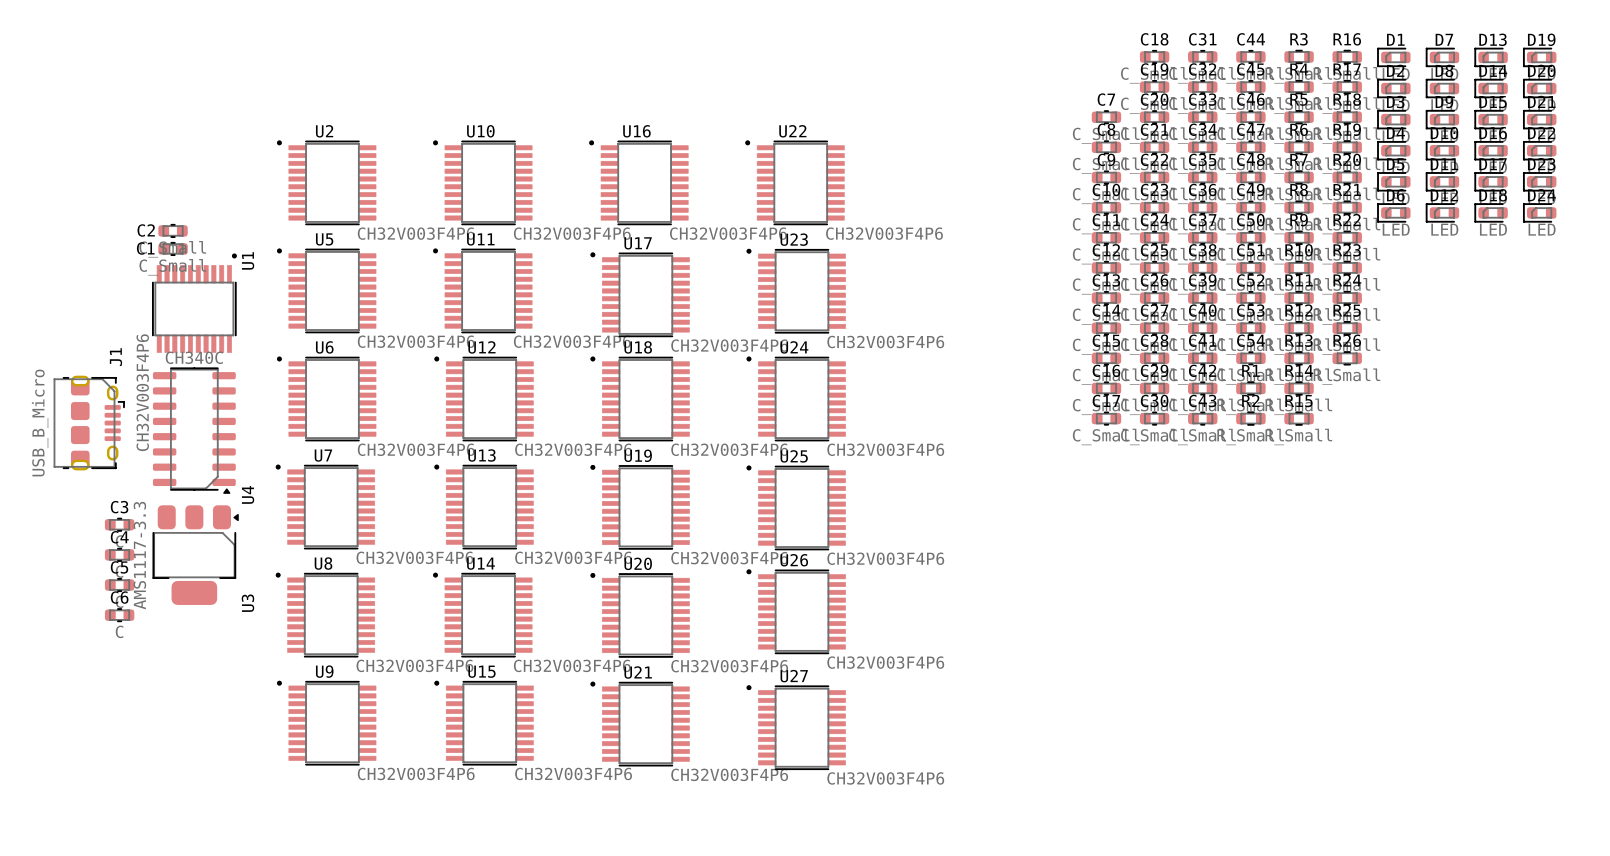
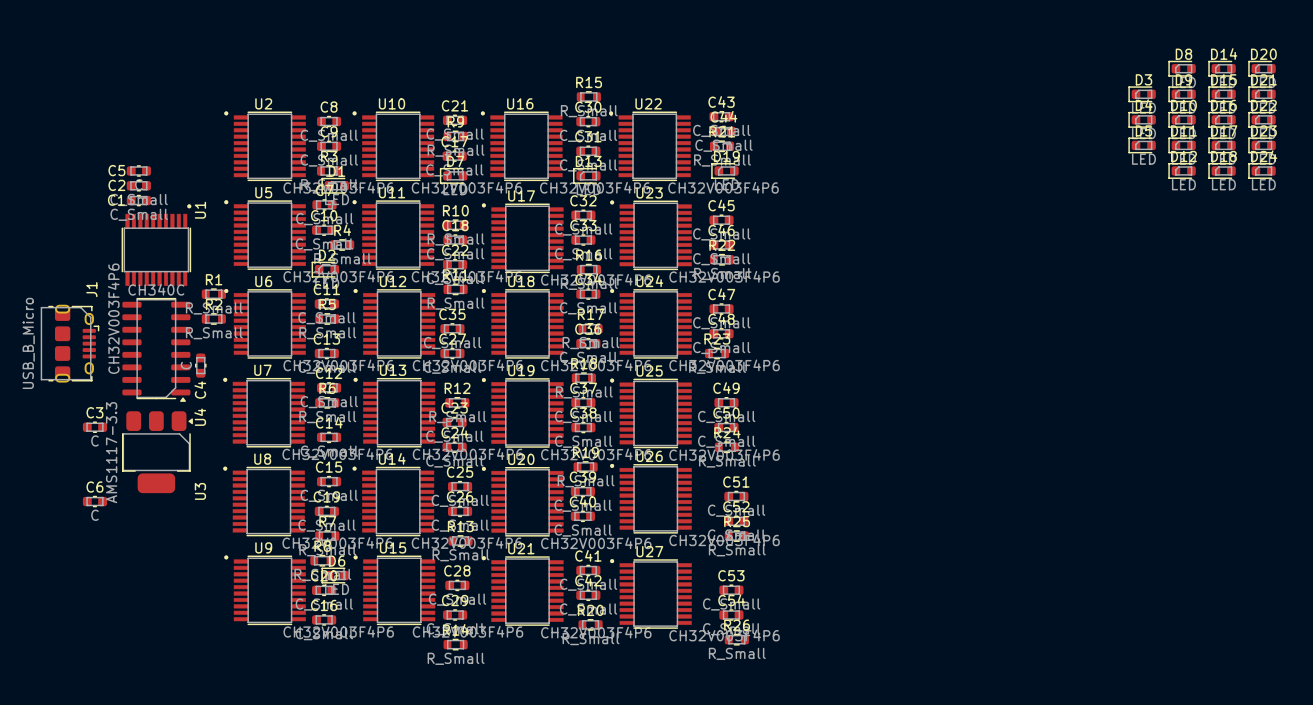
C18 position: (1154, 56) -> (455, 240)
C31 position: (1202, 56) -> (588, 151)
C44 position: (1250, 56) -> (723, 131)
R3 position: (1299, 56) -> (329, 170)
R16 position: (1347, 56) -> (588, 269)
D1 position: (1393, 57) -> (335, 185)
D7 position: (1442, 57) -> (453, 175)
D13 position: (1491, 57) -> (586, 175)
D19 position: (1539, 57) -> (725, 170)
C19 position: (1154, 87) -> (326, 511)
C32 position: (1202, 87) -> (583, 215)
C45 position: (1250, 87) -> (721, 220)
R4 position: (1299, 87) -> (342, 244)
R17 position: (1347, 87) -> (590, 328)
D2 position: (1393, 88) -> (325, 269)
C7 position: (1106, 117) -> (324, 204)
C20 position: (1154, 117) -> (324, 590)
C33 position: (1202, 117) -> (583, 240)
C46 position: (1250, 117) -> (721, 244)
R5 position: (1299, 117) -> (327, 318)
R18 position: (1347, 117) -> (583, 378)
C8 position: (1106, 147) -> (329, 121)
C21 position: (1154, 147) -> (455, 120)
C34 position: (1202, 147) -> (588, 294)
C47 position: (1250, 147) -> (721, 309)
R6 position: (1299, 147) -> (327, 402)
R19 position: (1347, 147) -> (585, 466)
C9 position: (1106, 177) -> (329, 146)
C22 position: (1154, 177) -> (455, 264)
C35 position: (1202, 177) -> (452, 328)
C48 position: (1250, 177) -> (721, 333)
R7 position: (1299, 177) -> (327, 536)
R20 position: (1347, 177) -> (590, 624)
C10 position: (1106, 207) -> (324, 230)
C23 position: (1154, 207) -> (454, 422)
C36 position: (1202, 207) -> (588, 343)
C49 position: (1250, 207) -> (726, 402)
R8 position: (1299, 207) -> (322, 560)
R21 position: (1347, 207) -> (722, 146)
D6 position: (1393, 212) -> (335, 575)
C11 position: (1106, 237) -> (326, 303)
C24 position: (1154, 237) -> (454, 447)
C37 position: (1202, 237) -> (583, 402)
C50 position: (1250, 237) -> (726, 427)
R9 position: (1299, 237) -> (455, 136)
R22 position: (1347, 237) -> (722, 259)
C12 position: (1106, 267) -> (329, 387)
C25 position: (1154, 267) -> (460, 486)
C38 position: (1202, 267) -> (583, 427)
C51 position: (1250, 267) -> (736, 496)
R10 position: (1299, 267) -> (455, 225)
R23 position: (1347, 267) -> (717, 353)
C13 position: (1106, 298) -> (326, 353)
C26 position: (1154, 298) -> (460, 511)
C39 position: (1202, 298) -> (582, 491)
C52 position: (1250, 298) -> (736, 521)
R11 position: (1299, 298) -> (455, 289)
R24 position: (1347, 298) -> (726, 447)
C14 position: (1106, 328) -> (329, 437)
C27 position: (1154, 328) -> (452, 353)
C40 position: (1202, 328) -> (582, 516)
C53 position: (1250, 328) -> (731, 590)
R12 position: (1299, 328) -> (457, 402)
R25 position: (1347, 328) -> (736, 536)
C15 position: (1106, 358) -> (329, 481)
C28 position: (1154, 358) -> (457, 585)
C41 position: (1202, 358) -> (588, 570)
C54 position: (1250, 358) -> (731, 615)
R13 position: (1299, 358) -> (460, 541)
R26 position: (1347, 358) -> (736, 639)
C16 position: (1106, 388) -> (324, 619)
C29 position: (1154, 388) -> (455, 615)
C42 position: (1202, 388) -> (588, 595)
R1 position: (1250, 388) -> (213, 294)
R14 position: (1299, 388) -> (455, 644)
C17 position: (1106, 418) -> (454, 156)
C30 position: (1154, 418) -> (588, 121)
C43 position: (1202, 418) -> (721, 116)
R2 position: (1250, 418) -> (213, 318)
R15 position: (1299, 418) -> (588, 96)
U4 name position: U4 (248, 494) -> U4 (200, 417)
C4 name position: C4 (119, 537) -> C4 (200, 390)
C4 rotation: 0° (119, 554) -> 90° clockwise (200, 365)
C4 position: (119, 554) -> (200, 365)
C5 name position: C5 (119, 567) -> C5 (116, 170)
C5 position: (119, 585) -> (138, 170)

